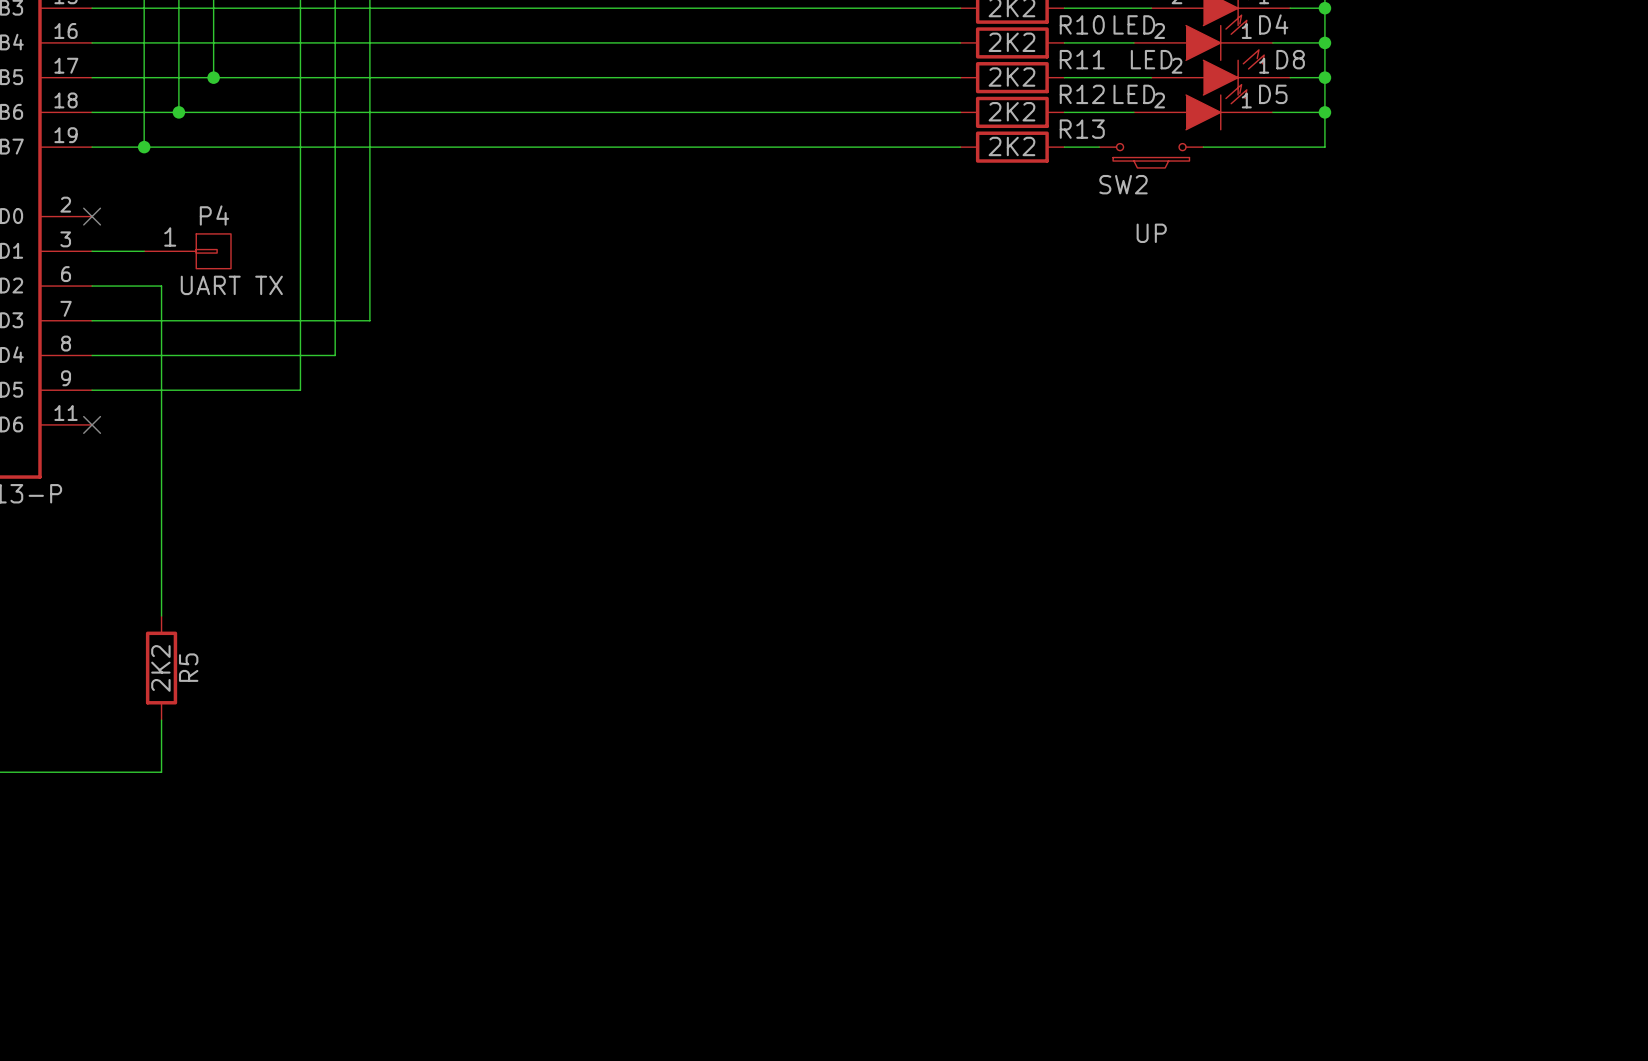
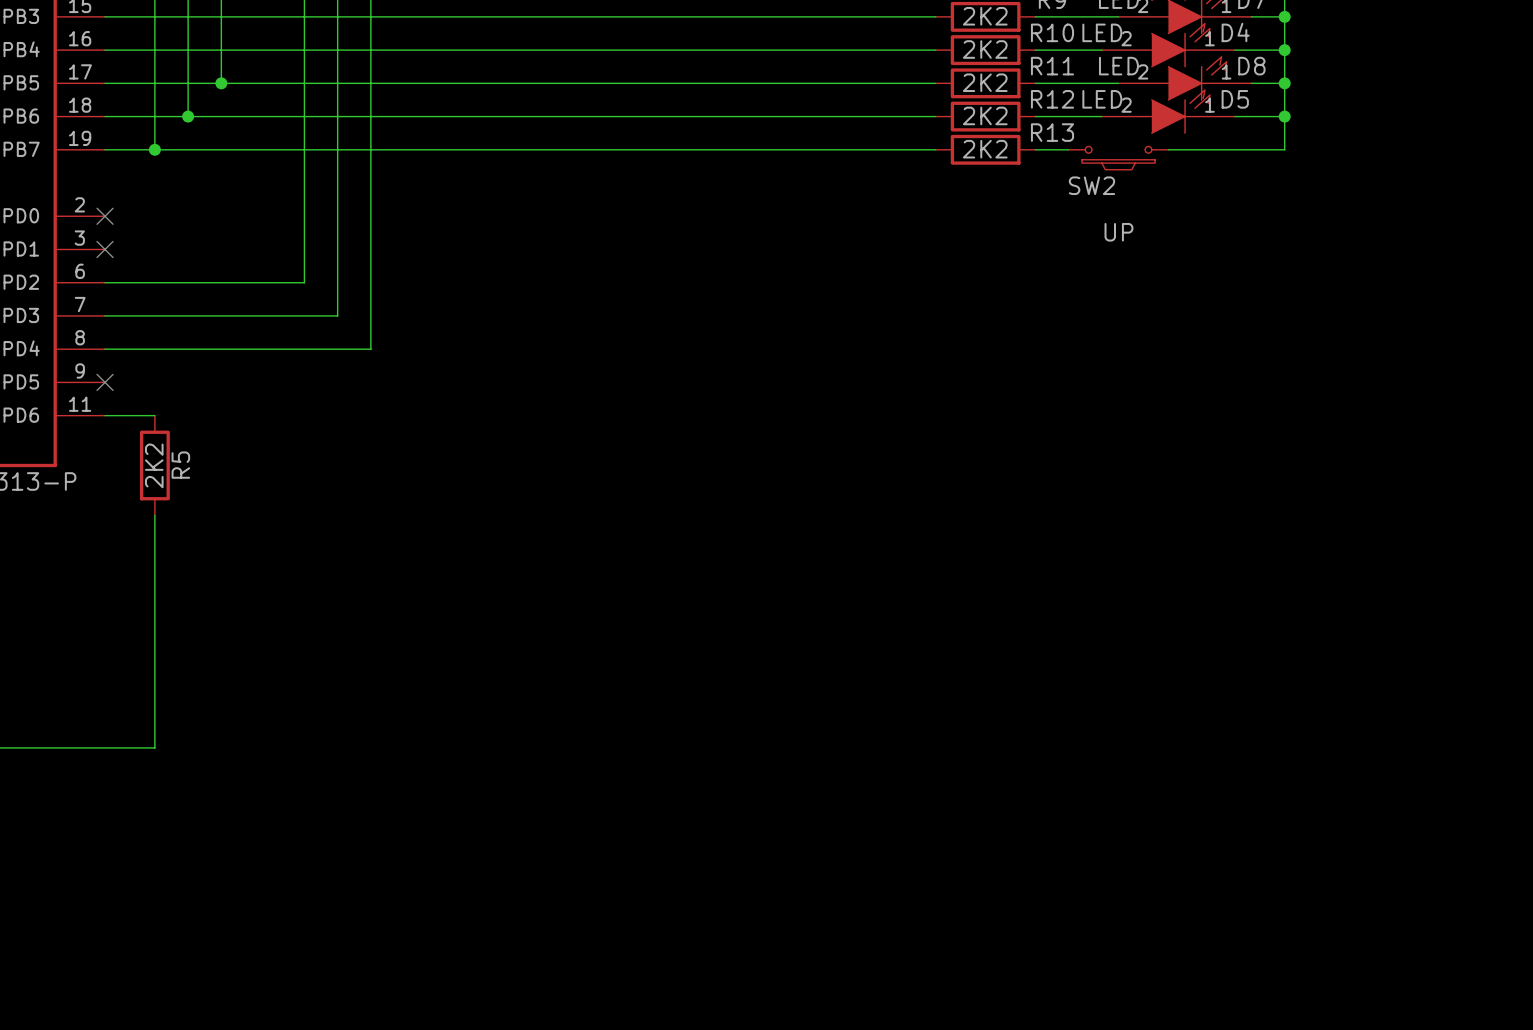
wire: (92, 251) (144, 251) -> (105, 415) (154, 415)
no-connect mark: none -> (105, 249)
P4: UART TX (187, 251) -> none
wire: (161, 286) (161, 615) -> none
wire: (300, 286) (300, 390) (92, 390) -> (304, 282) (171, 282)
wire: (369, 320) (335, 320) (335, 355) -> (370, 315) (370, 349) (337, 349)
no-connect mark position: (92, 424) -> (105, 382)
R5 position: (161, 668) -> (154, 465)
wire: (161, 720) (161, 772) (144, 772) -> (154, 515) (154, 747)

